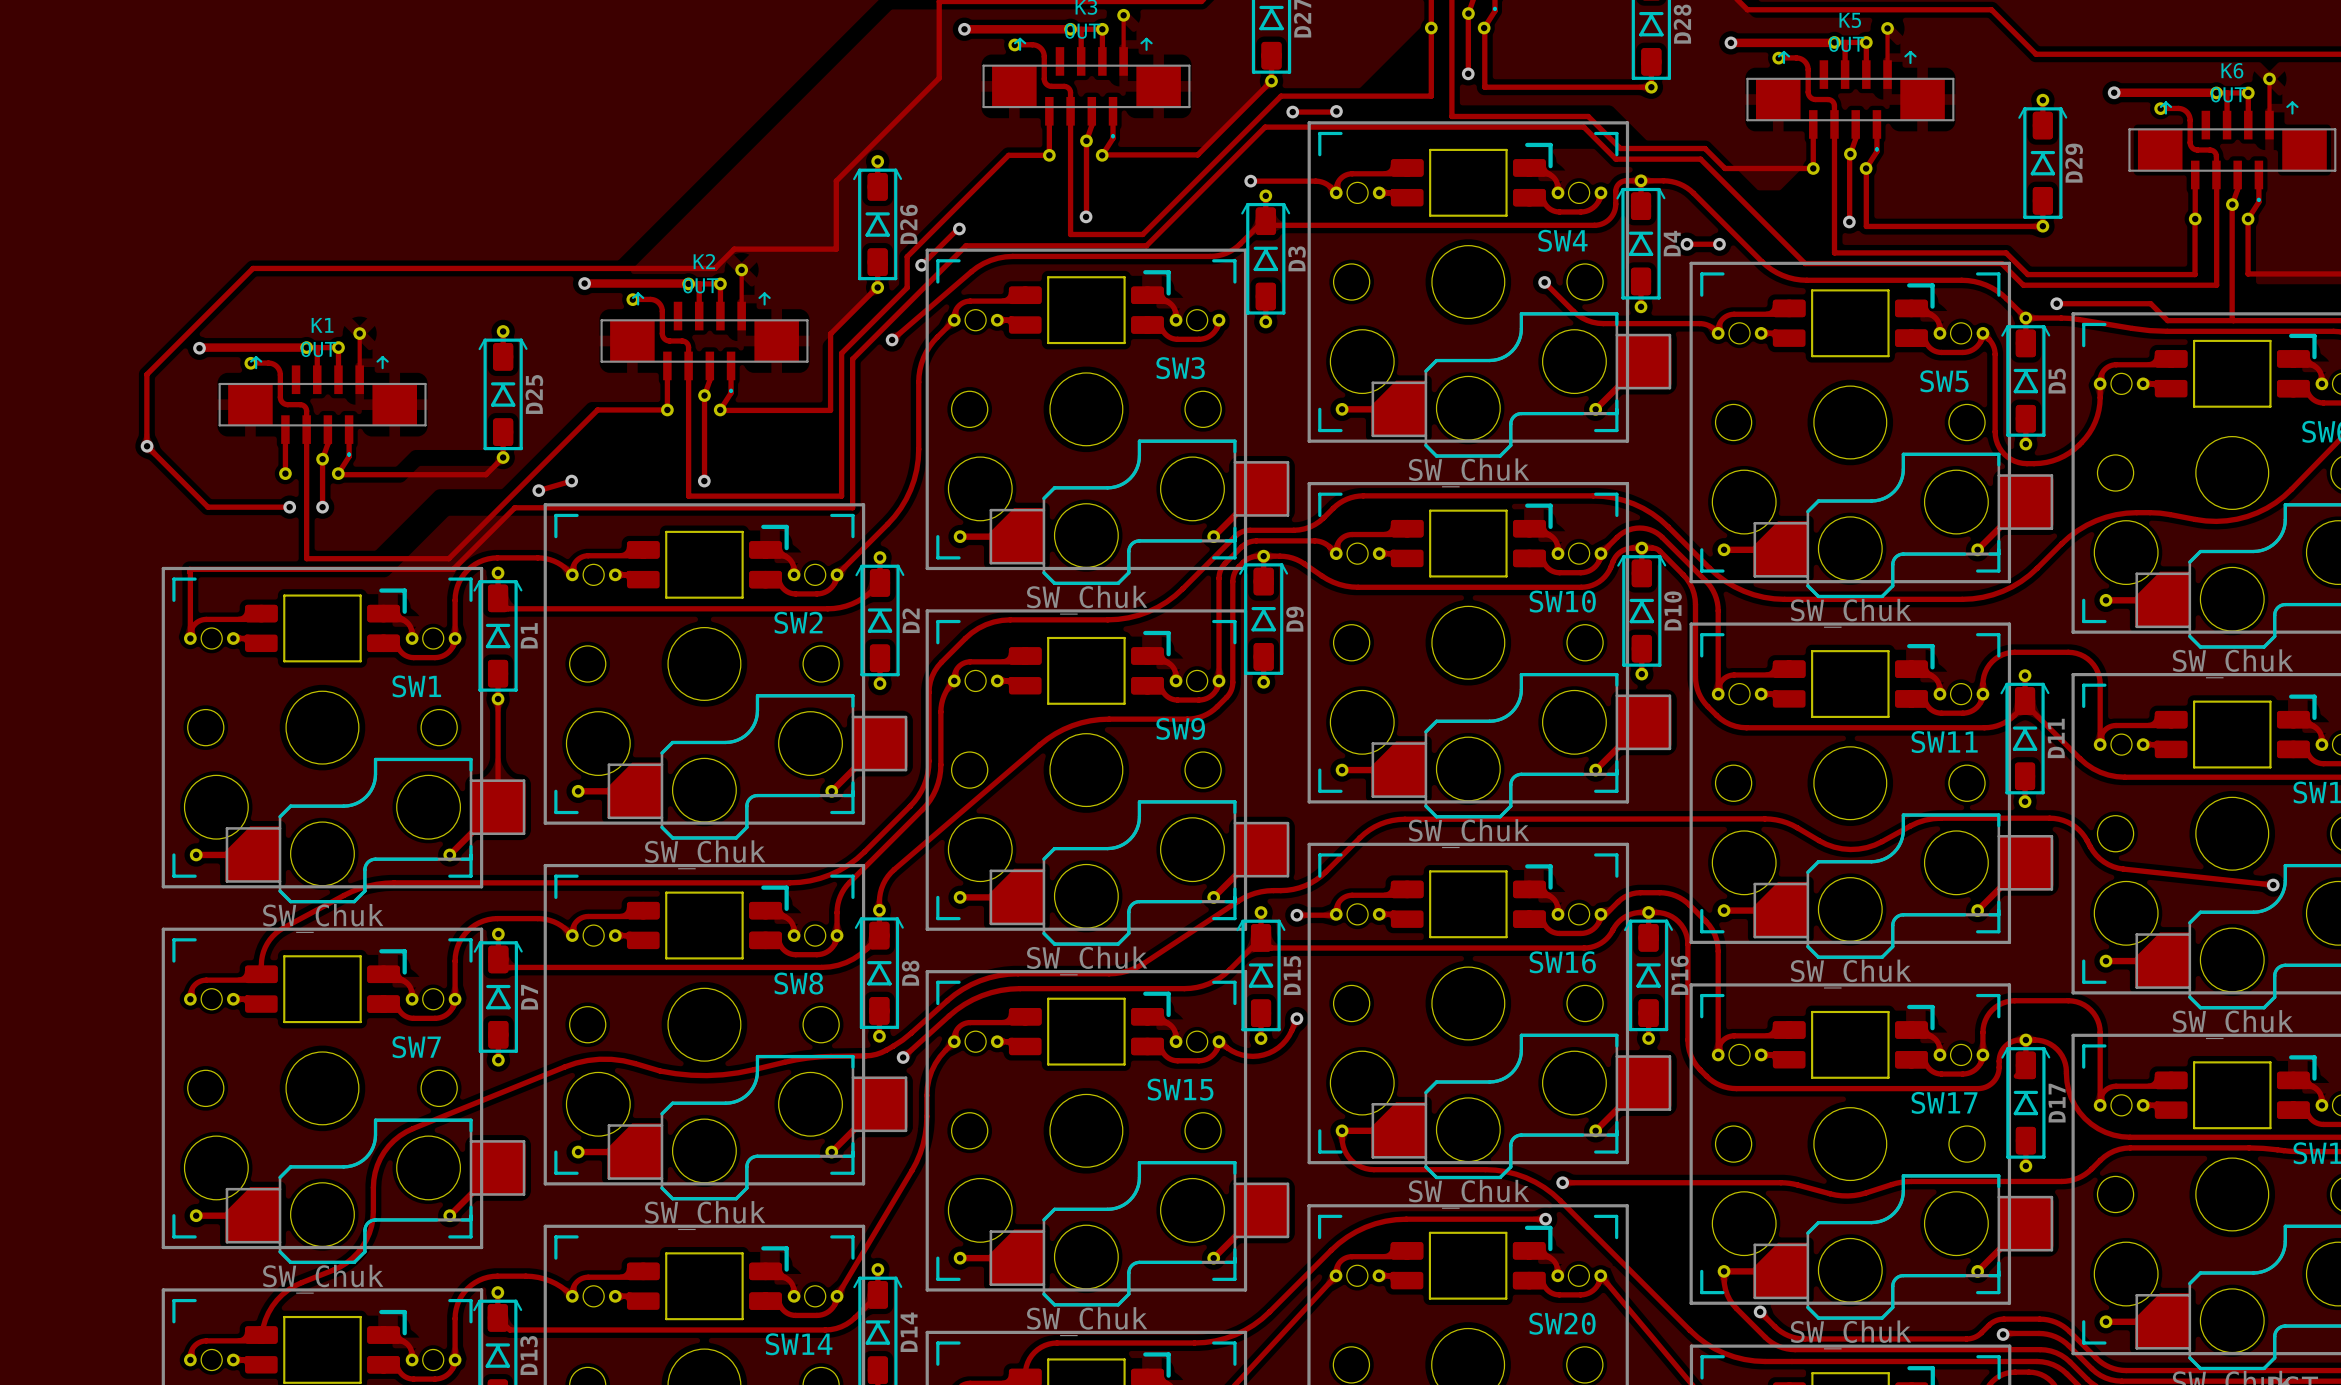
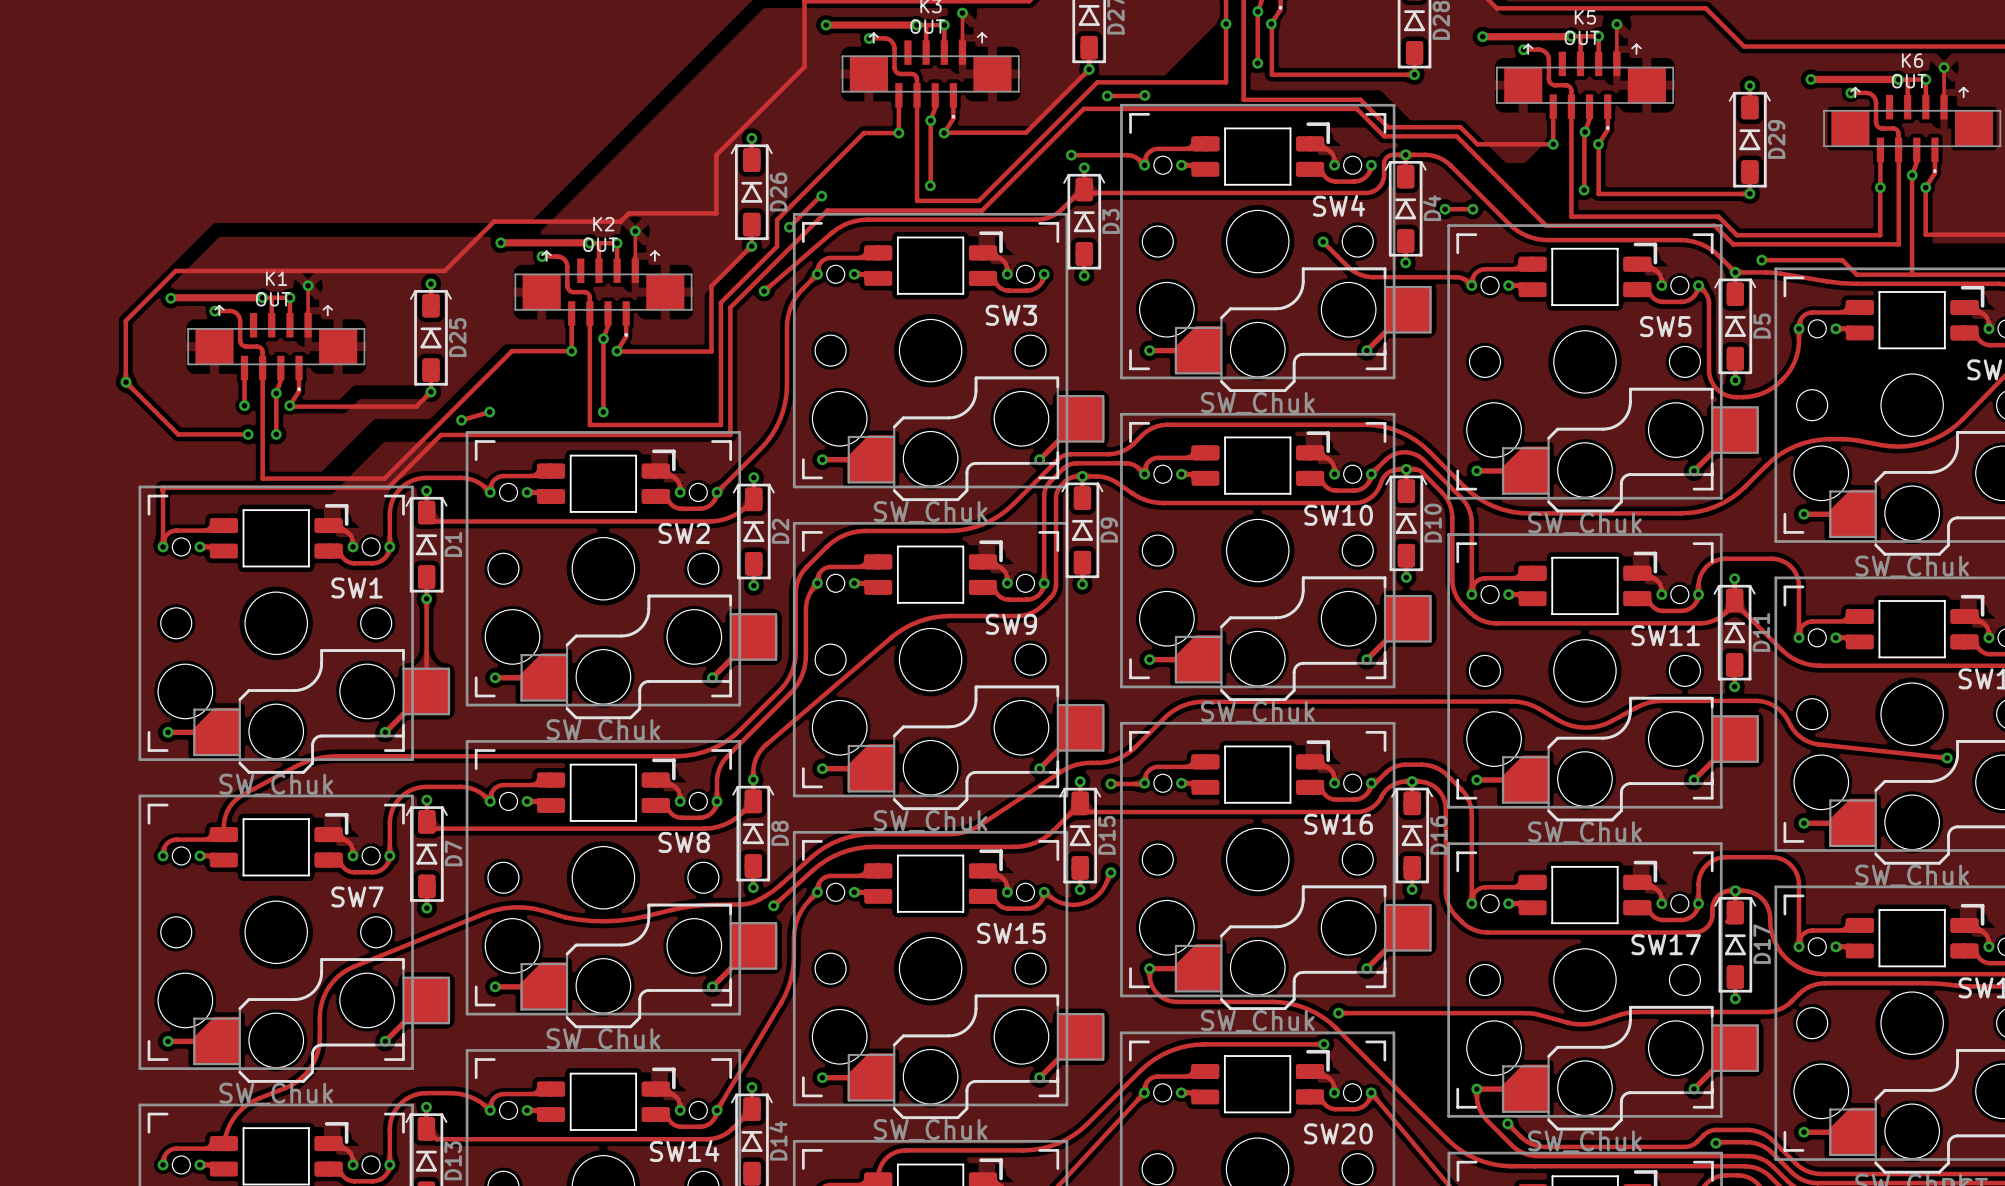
track: (724, 258) (714, 268) (252, 268) (205, 316) -> (620, 221) (494, 221) (444, 270) (175, 270)

